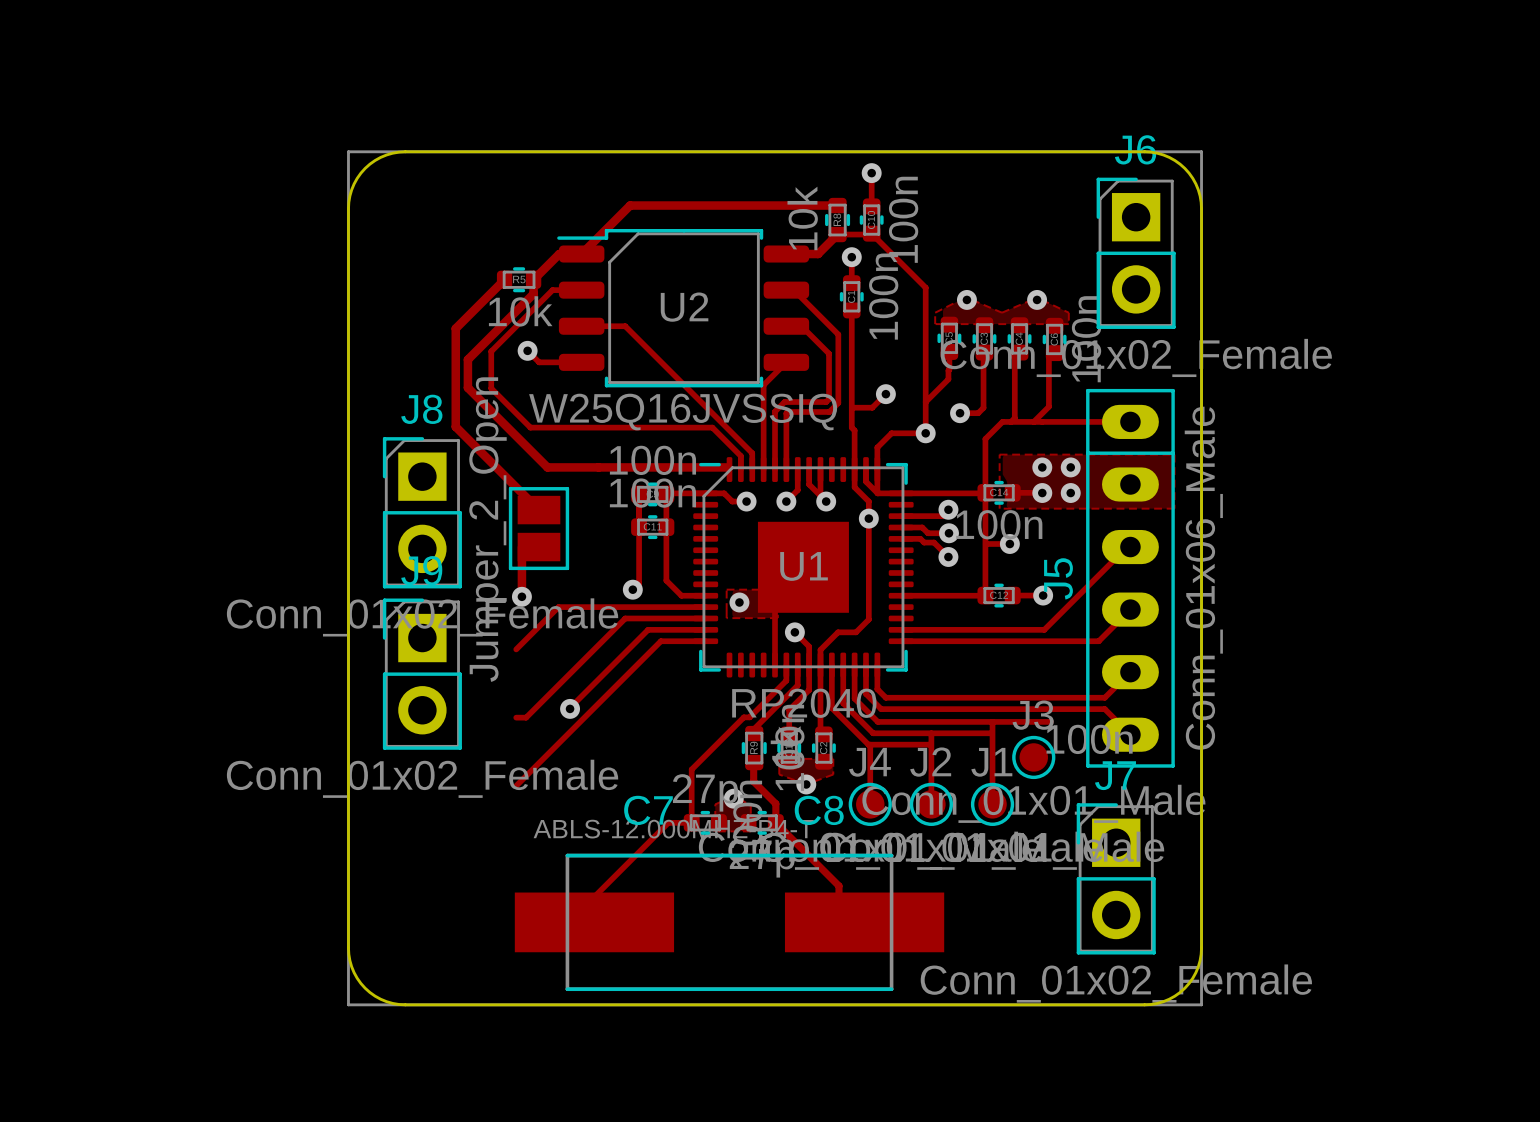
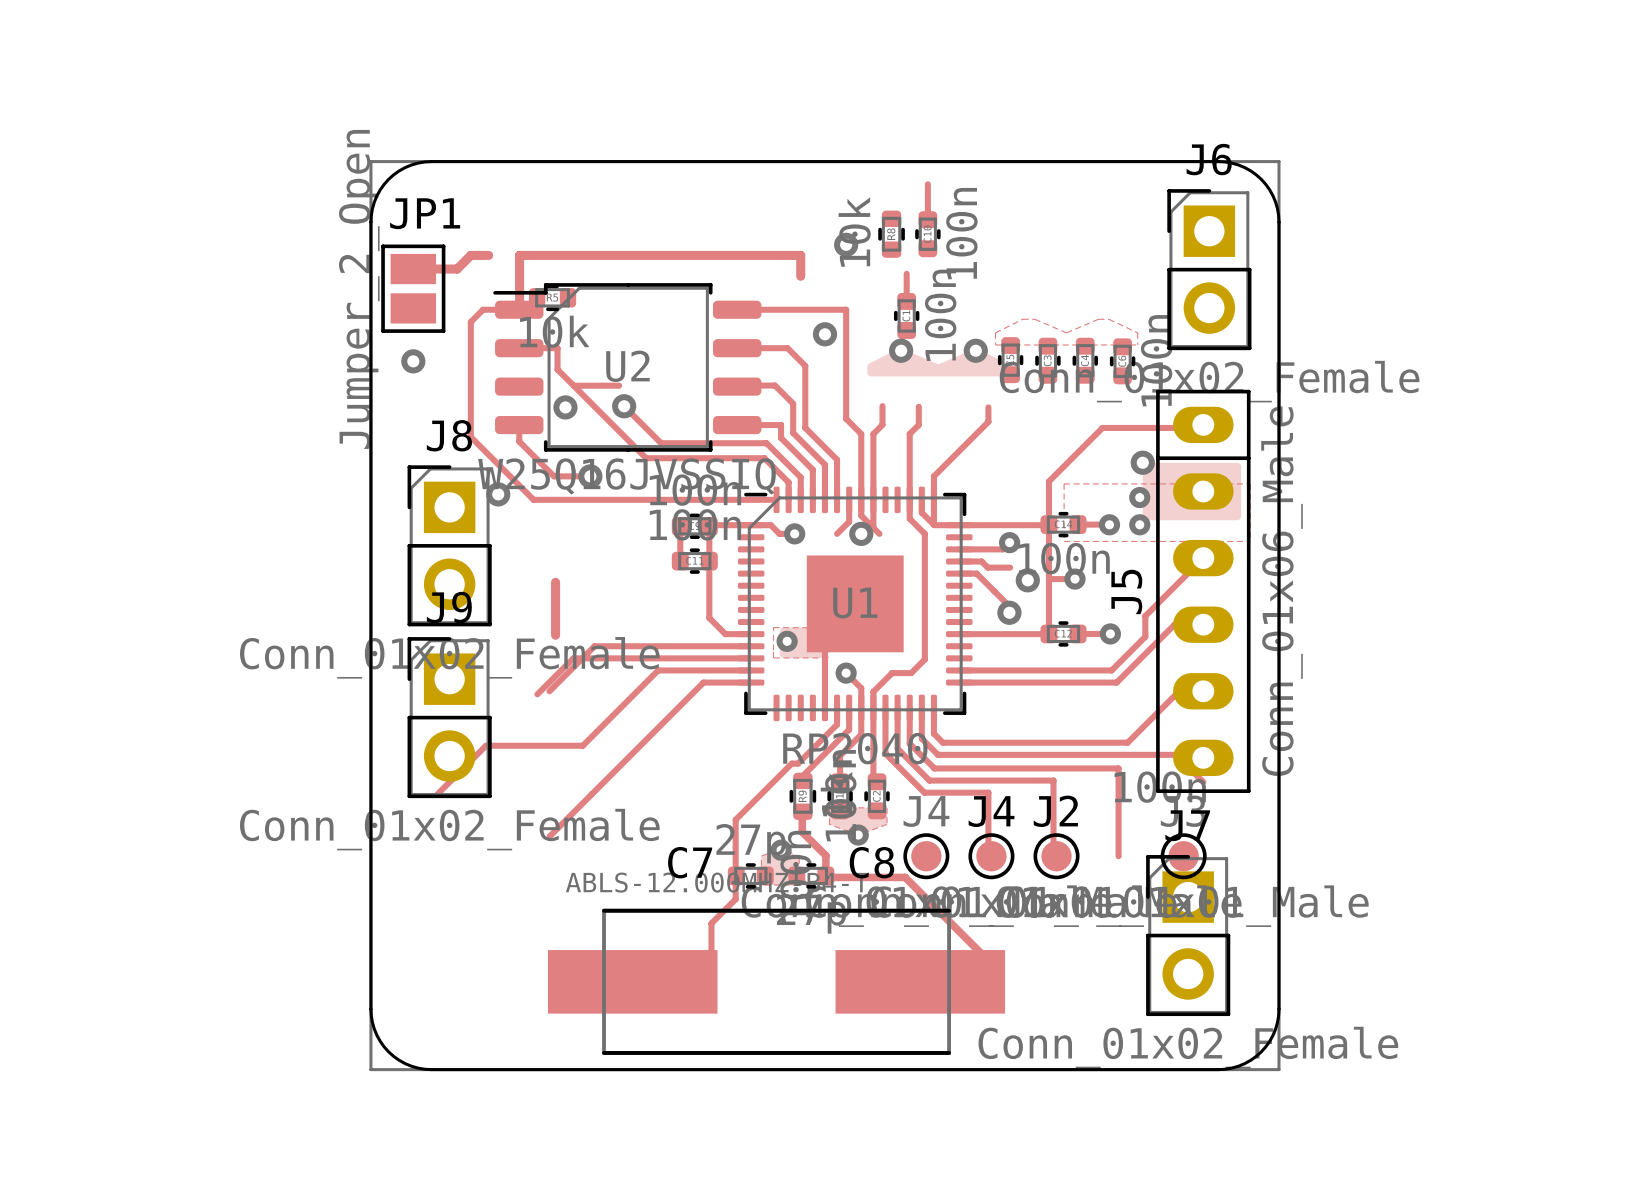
via: (871, 173) -> none
track: (829, 205) (630, 205) (581, 254) (559, 254) (533, 279) (533, 293) (467, 359) (467, 387) (547, 467) (727, 467) -> none
via: none -> (846, 244)
track: none -> (488, 255) (470, 255) (457, 269) (413, 269)
track: (786, 254) (818, 254) (837, 234) (871, 233) (925, 287) (925, 433) (891, 433) -> (988, 407) (988, 421) (949, 461)
via: (851, 257) -> none
track: none -> (800, 276) (800, 255) (519, 255) (519, 309)
JP1: none -> Jumper_2_Open (413, 288)
track: (504, 279) (455, 328) (455, 426) (538, 510) -> none
track: none -> (519, 309) (483, 309) (470, 322) (470, 437) (533, 499) (776, 499)
track: (581, 290) (552, 290) (491, 351) (491, 388) (530, 427) (712, 427) (740, 456) -> (573, 385) (646, 458) (764, 458) (788, 482) (788, 485)
track: none -> (737, 309) (846, 309) (846, 418) (861, 433) (861, 499)
track: (786, 290) (793, 290) (838, 334) (838, 403) (829, 411) (787, 411) (786, 431) -> (737, 348) (787, 348) (805, 365) (805, 427) (837, 459)
via: (966, 299) -> none
via: (1037, 299) -> none
U2 position: (683, 308) -> (627, 367)
track: (851, 310) (851, 427) (854, 430) -> (918, 406) (918, 424) (909, 433) (909, 458)
via: none -> (824, 334)
track: (581, 326) (625, 326) (752, 453) -> (766, 443) (800, 477) (800, 482)
track: (786, 326) (801, 326) (829, 353) (829, 381) -> none
track: none -> (519, 348) (557, 348) (557, 369) (561, 373)
via: none -> (901, 350)
via: none -> (975, 350)
via: none -> (413, 361)
via: (527, 350) -> none
track: (949, 351) (948, 379) (925, 402) -> none
track: (983, 352) (983, 407) (978, 413) (960, 413) -> none
track: (1014, 352) (1014, 418) (1011, 421) -> none
track: (1048, 353) (1048, 406) (1033, 421) -> none
track: (786, 362) (763, 385) (763, 441) -> (737, 425) (781, 425) (781, 438) (812, 469)
track: none -> (737, 386) (775, 385) (793, 403) (793, 432) (824, 464)
track: none -> (624, 406) (661, 443) (765, 443)
via: none -> (624, 406)
via: none -> (565, 407)
track: (885, 394) (872, 407) (854, 407) -> none
via: (885, 394) -> none
track: none -> (519, 425) (519, 441) (554, 476) (590, 476)
track: (826, 402) (784, 402) (775, 411) (775, 436) -> (879, 427) (873, 433) (873, 499)
via: (960, 413) -> none
track: (1130, 421) (1002, 421) (985, 438) (985, 452) -> (1182, 427) (1102, 427) (1048, 481)
via: (925, 433) -> none
via: none -> (1142, 462)
via: none -> (590, 476)
via: none -> (498, 494)
via: (1042, 467) -> none
via: (786, 501) -> none
via position: (826, 501) -> (861, 533)
via: (868, 518) -> none
track: (639, 527) (639, 583) (632, 589) -> none
part: Jumper_2_Open (538, 528) -> none
via: (948, 533) -> none
track: (917, 538) (924, 542) (933, 542) (948, 556) -> (976, 573) (1009, 606) (1009, 612)
via: none -> (1027, 580)
track: (1130, 547) (1127, 547) (1075, 598) -> (1203, 558) (1145, 616) (1145, 636)
via: (948, 556) -> none
via: none -> (1009, 612)
J5 position: (1130, 578) -> (1203, 591)
via: (632, 589) -> none
via: (521, 596) -> none
track: (1130, 609) (1098, 641) (1049, 641) -> (1203, 624) (1174, 624) (1116, 682)
track: (625, 618) (526, 717) (516, 717) -> (665, 658) (573, 658) (537, 694)
track: (648, 629) (570, 708) -> (689, 670) (658, 670) (582, 745) (485, 745) (437, 794)
track: (1130, 672) (1104, 697) (1059, 697) -> (1203, 691) (1179, 691) (1127, 742)
via: (570, 708) -> none
track: (992, 721) (992, 804) -> (1118, 768) (1118, 856)
track: (931, 733) (931, 804) -> (1053, 780) (1053, 856)
track: (870, 744) (870, 804) -> (988, 792) (988, 856)
J3 position: (1033, 757) -> (1183, 856)
J2 name: J2 (930, 762) -> J4 (991, 811)
J1 name: J1 (991, 762) -> J2 (1055, 811)
track: (691, 769) (691, 822) (668, 822) (571, 919) -> (736, 819) (735, 899) (711, 923) (711, 978)
track: (777, 824) (838, 885) (838, 922) -> (827, 877) (905, 877) (999, 971)

